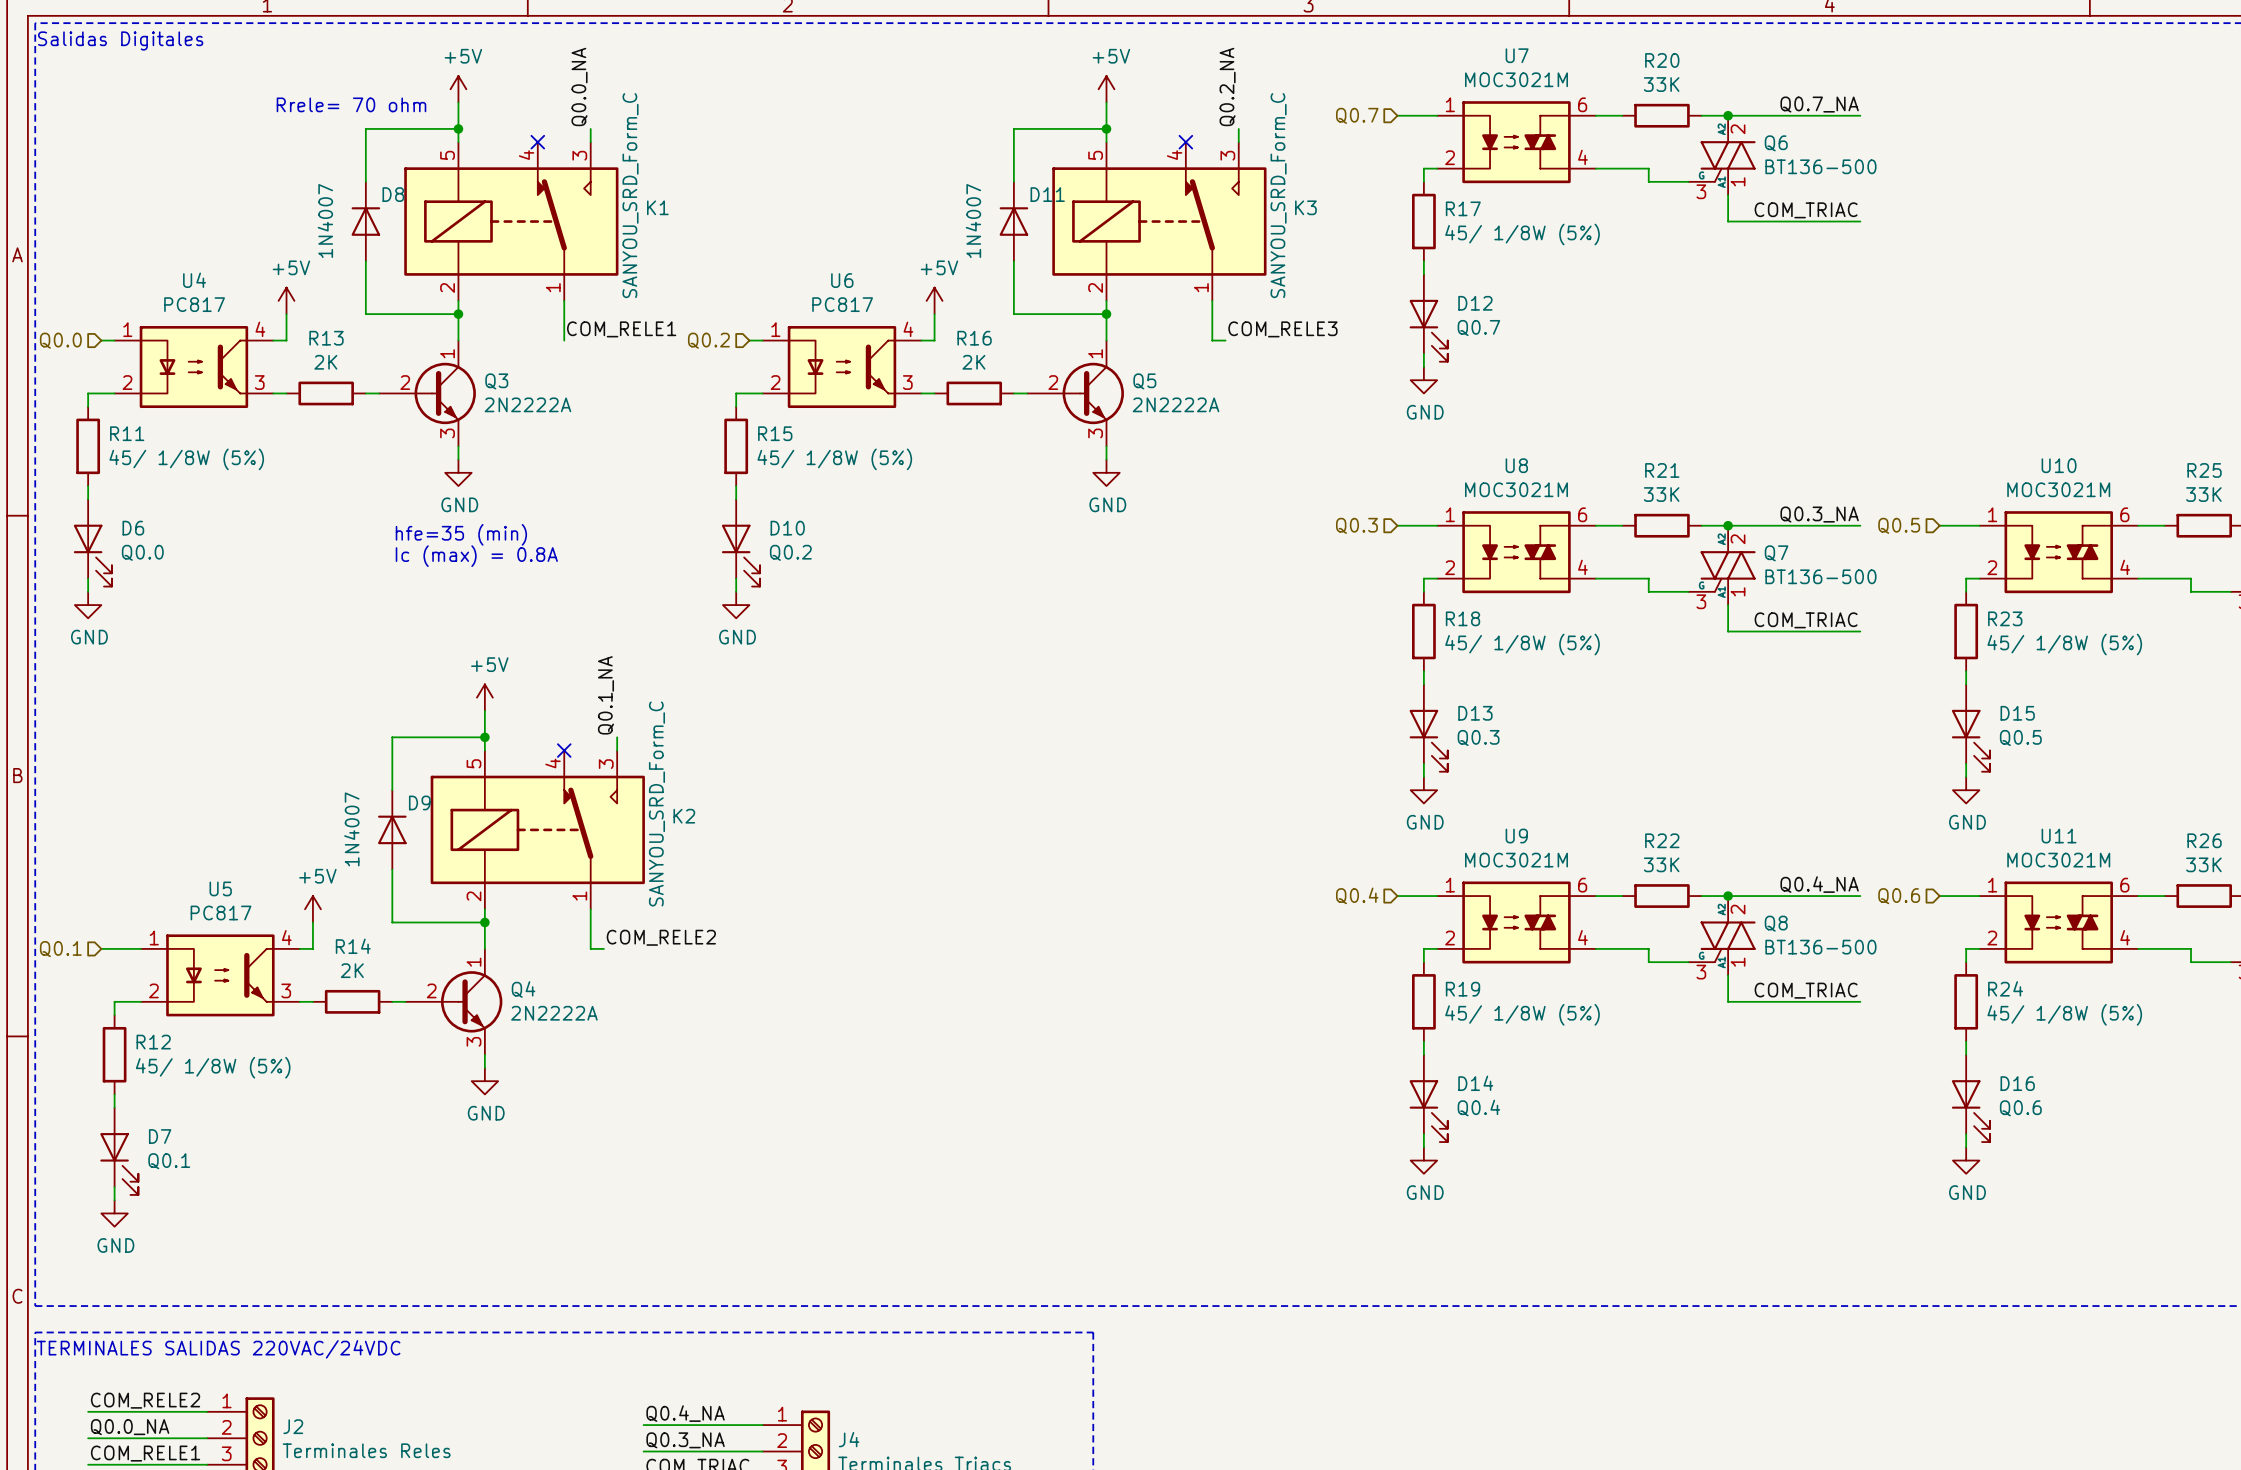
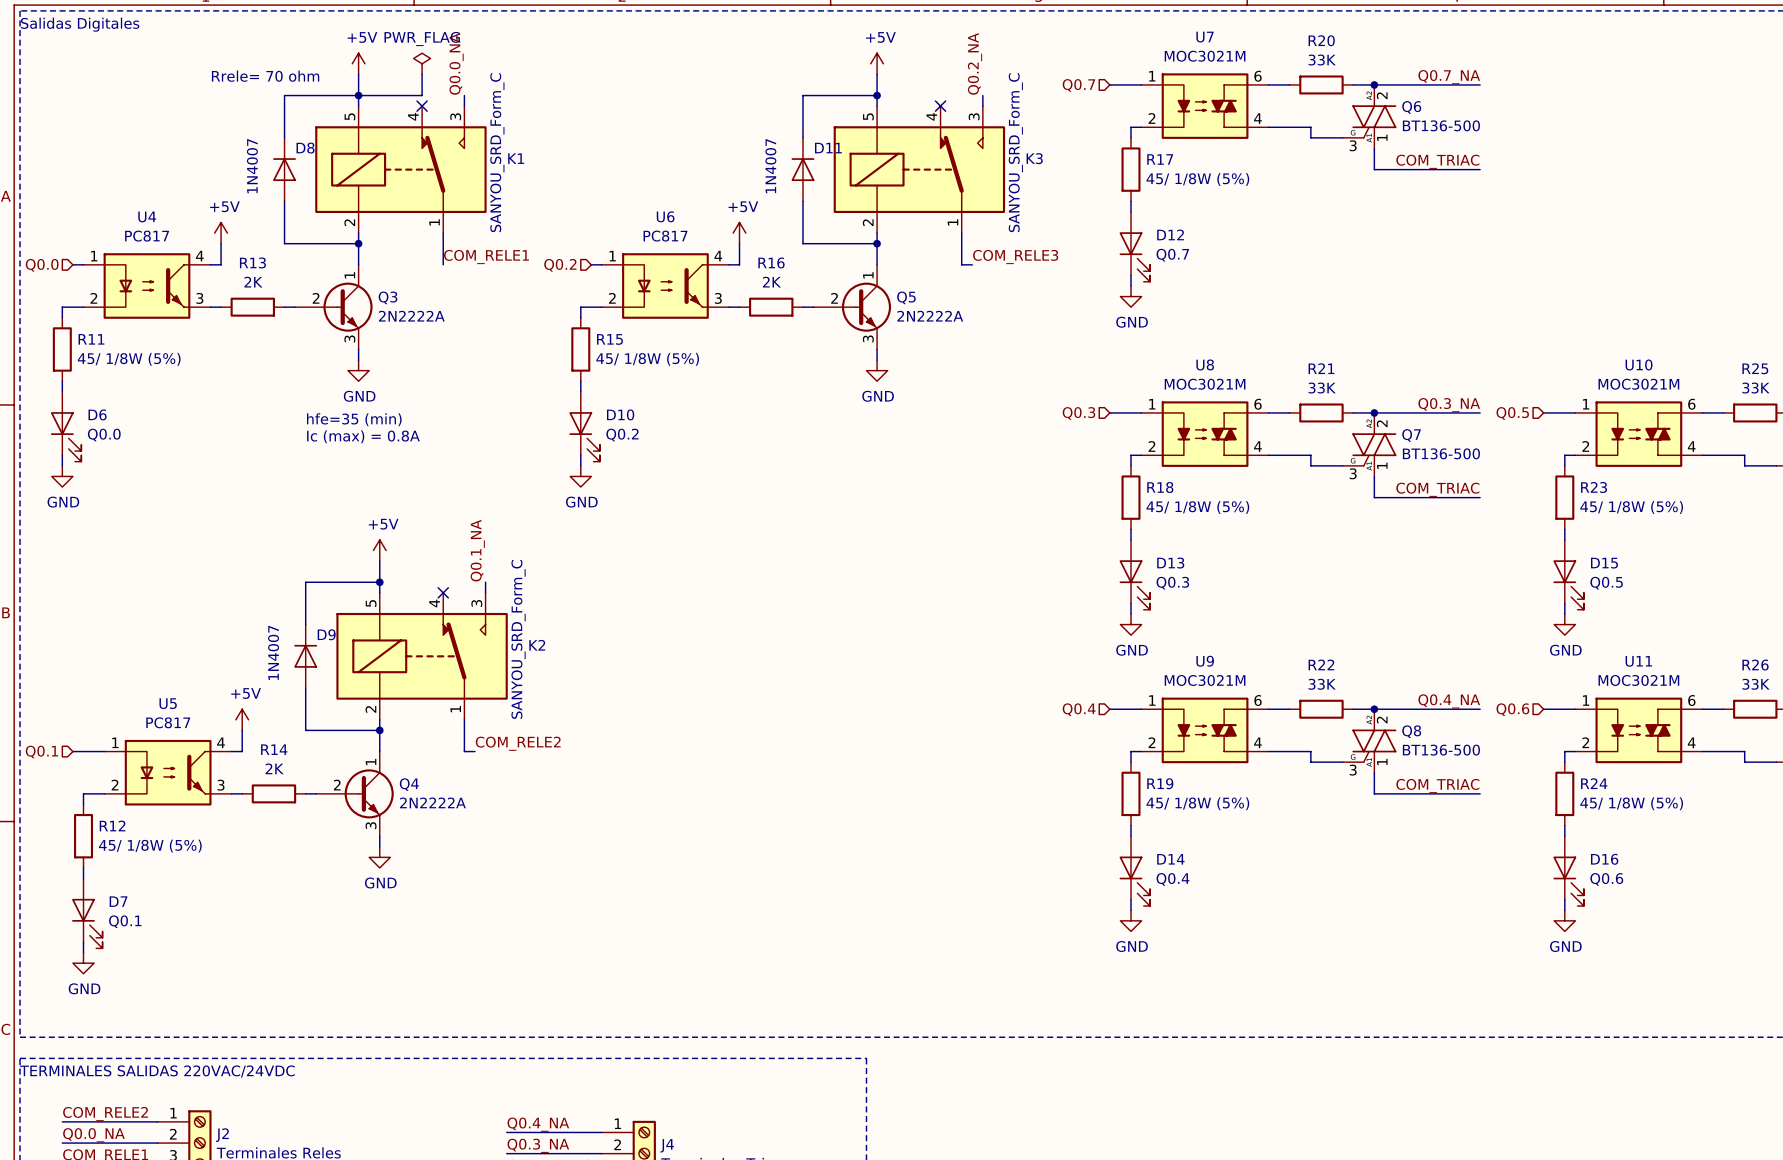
power symbol: none -> PWR_FLAG (422, 63)
wire: none -> (422, 74) (422, 95) (358, 95)

